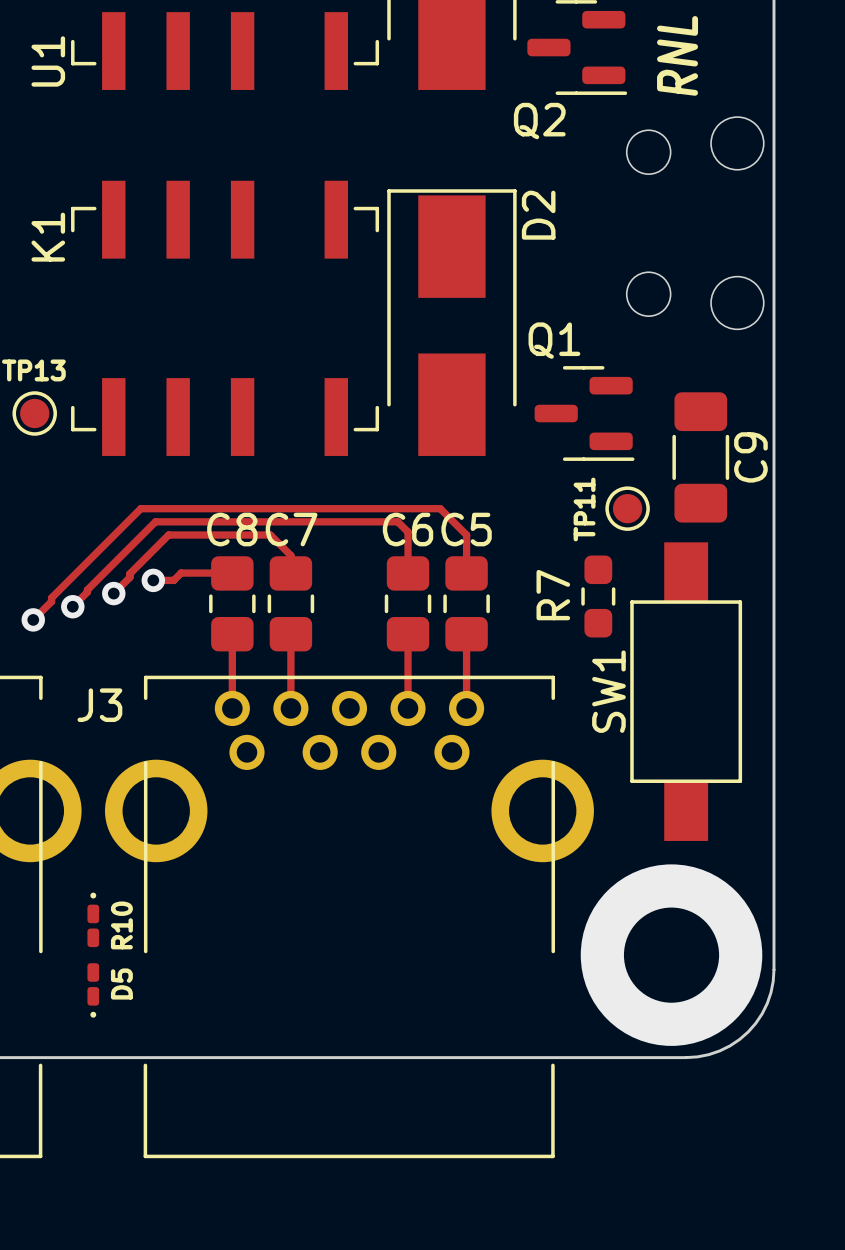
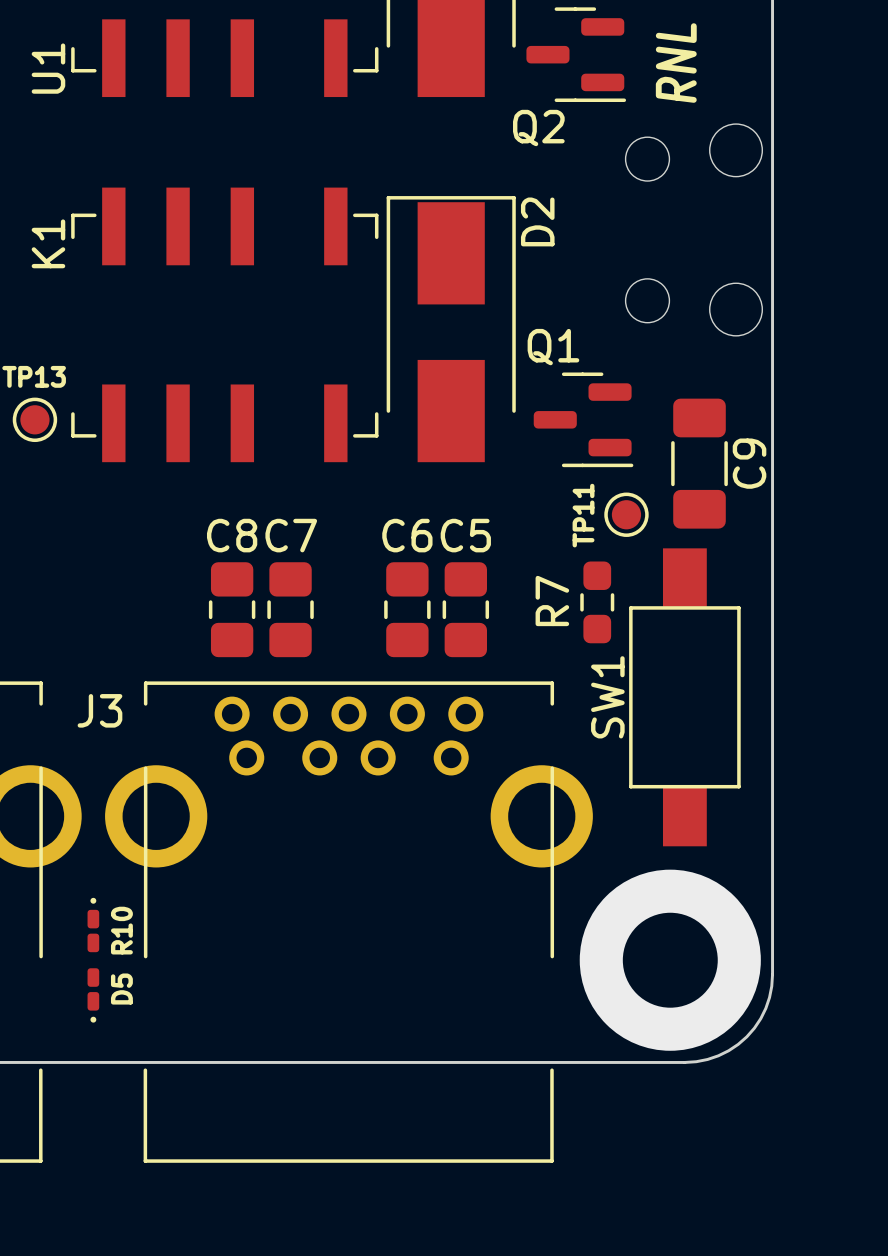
track: (231, 573) (181, 573) (173, 580) (153, 580) -> none
track: (290, 573) (290, 555) (270, 535) (168, 535) (129, 573) (129, 577) (113, 593) -> none
track: (408, 573) (408, 532) (397, 521) (155, 521) (72, 606) -> none
track: (466, 573) (466, 535) (440, 508) (140, 508) (51, 597) (51, 601) (33, 619) -> none
via: (153, 580) -> none
via: (113, 593) -> none
via: (72, 606) -> none
via: (33, 619) -> none
track: (232, 634) (232, 708) -> none
track: (290, 634) (290, 708) -> none
track: (408, 634) (408, 708) -> none
track: (466, 634) (466, 708) -> none

